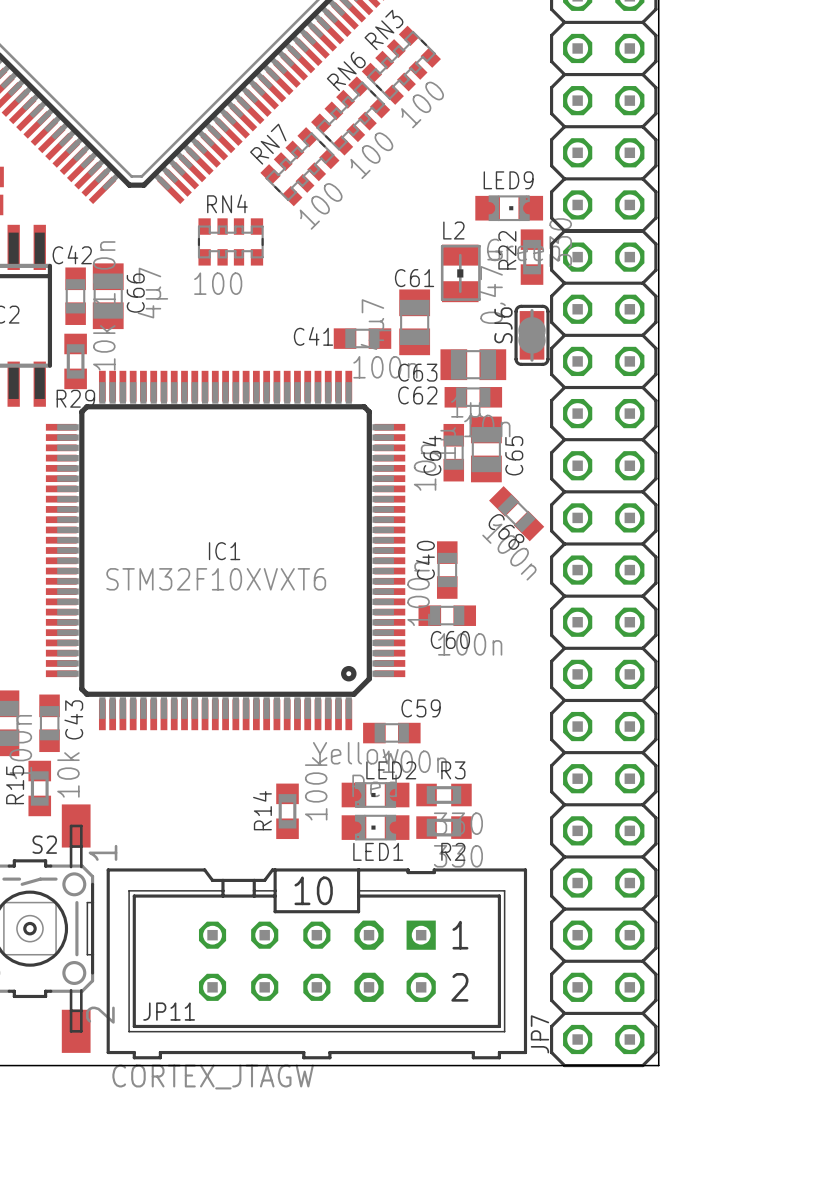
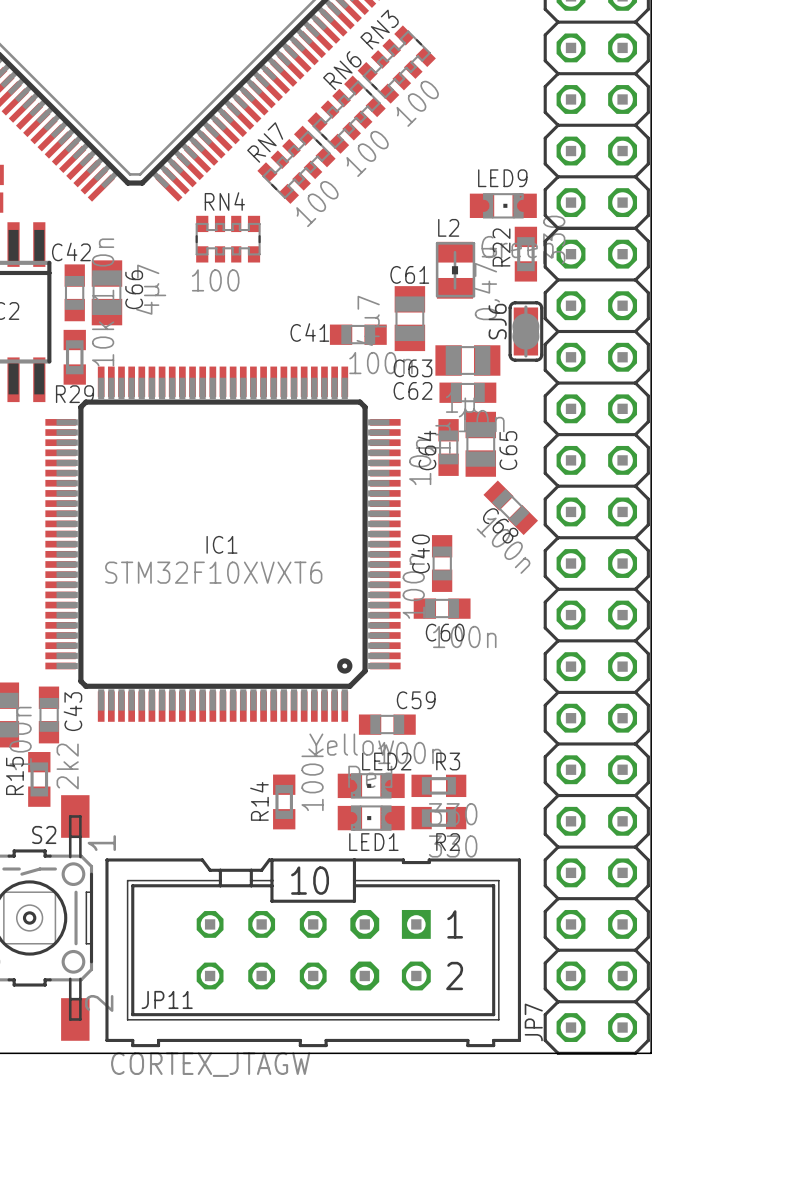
R15 value: 10k (68, 774) -> 2k2 (67, 766)

